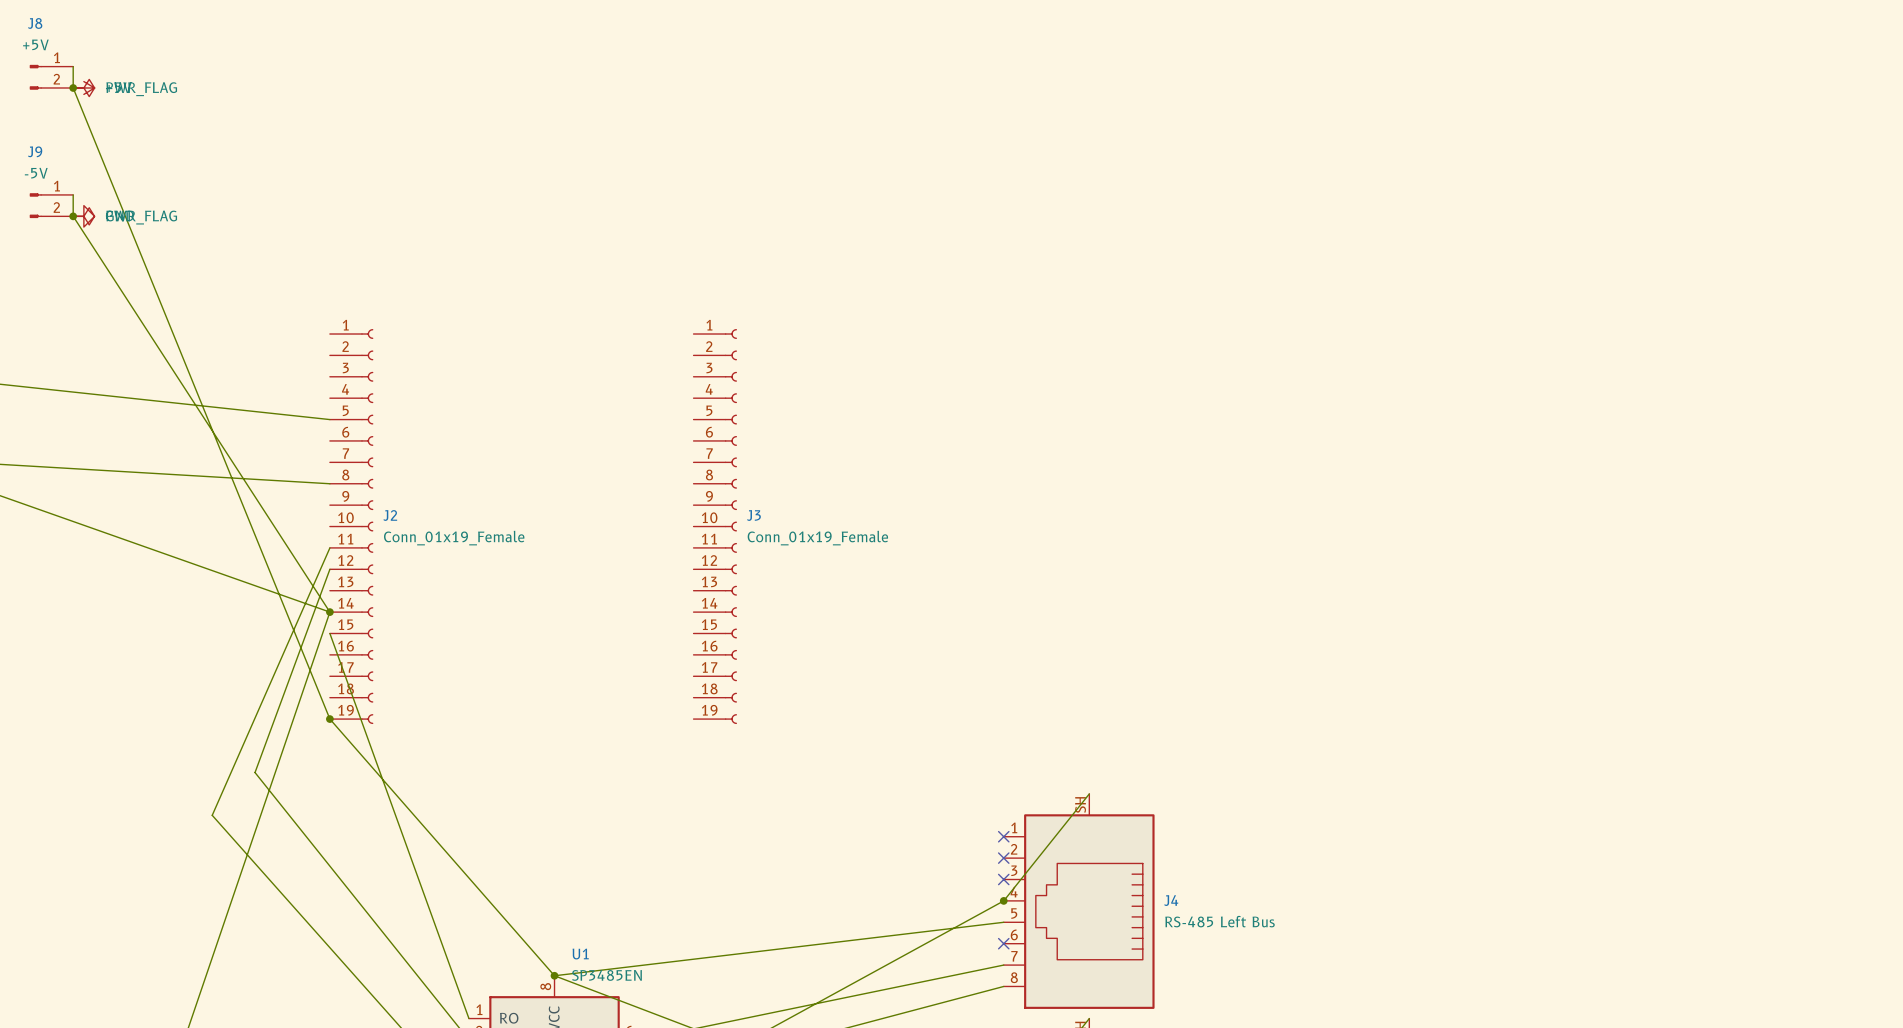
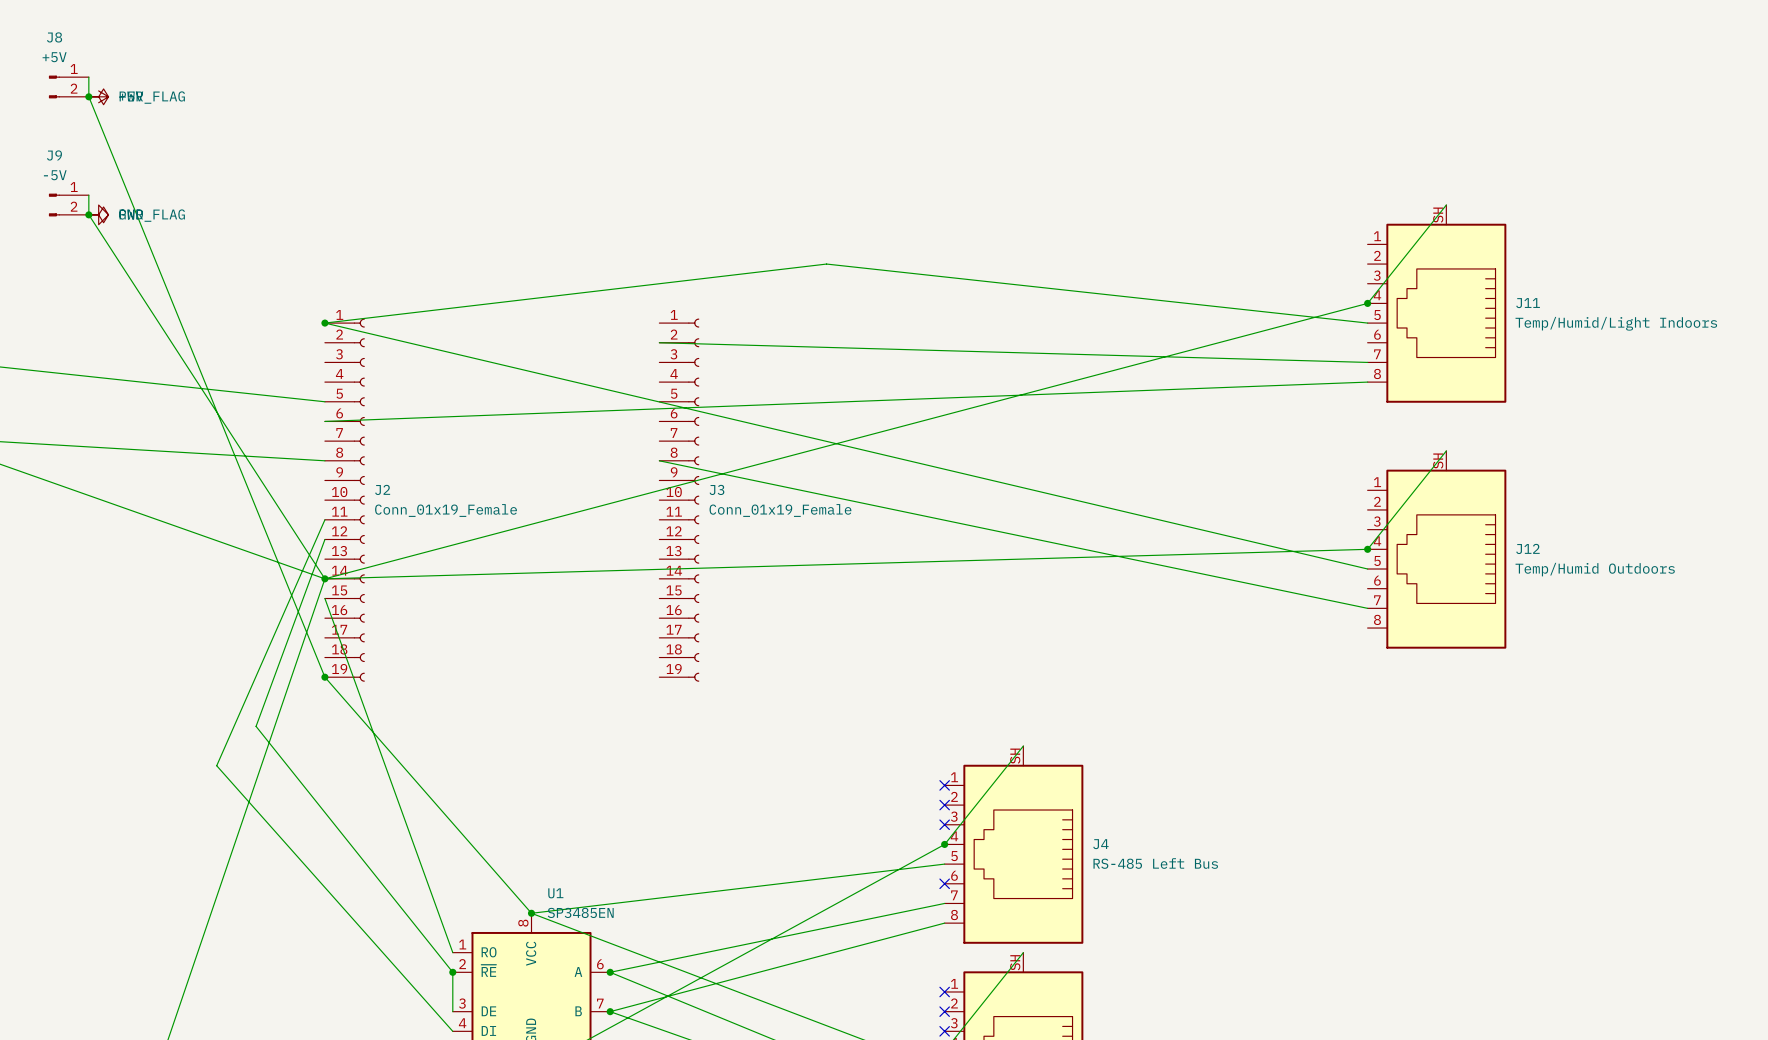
wire: none -> (1446, 205) (1367, 303) (324, 578) (1367, 549) (1446, 450)
junction: none -> (1367, 303)
J11: none -> Temp/Humid/Light Indoors (1436, 303)
junction: none -> (324, 323)
wire: none -> (1367, 323) (826, 264) (324, 323) (1367, 569)
wire: none -> (659, 342) (1367, 362)
wire: none -> (1367, 382) (324, 421)
wire: none -> (659, 460) (1367, 608)
junction: none -> (1367, 549)
J12: none -> Temp/Humid Outdoors (1436, 549)

